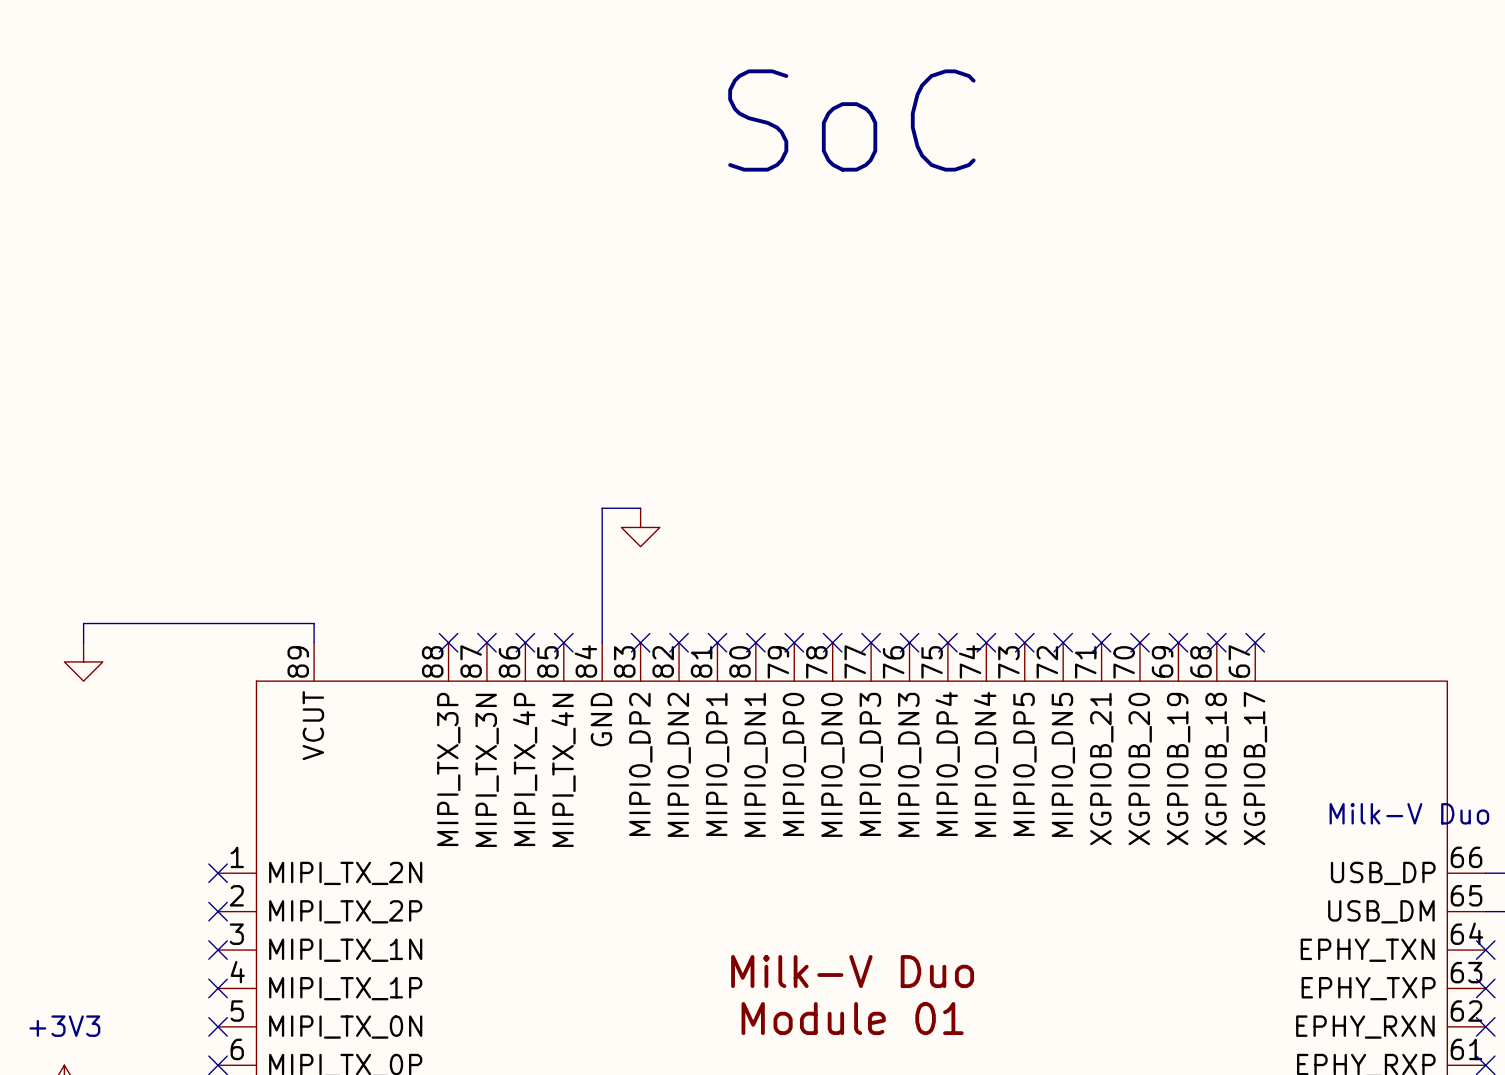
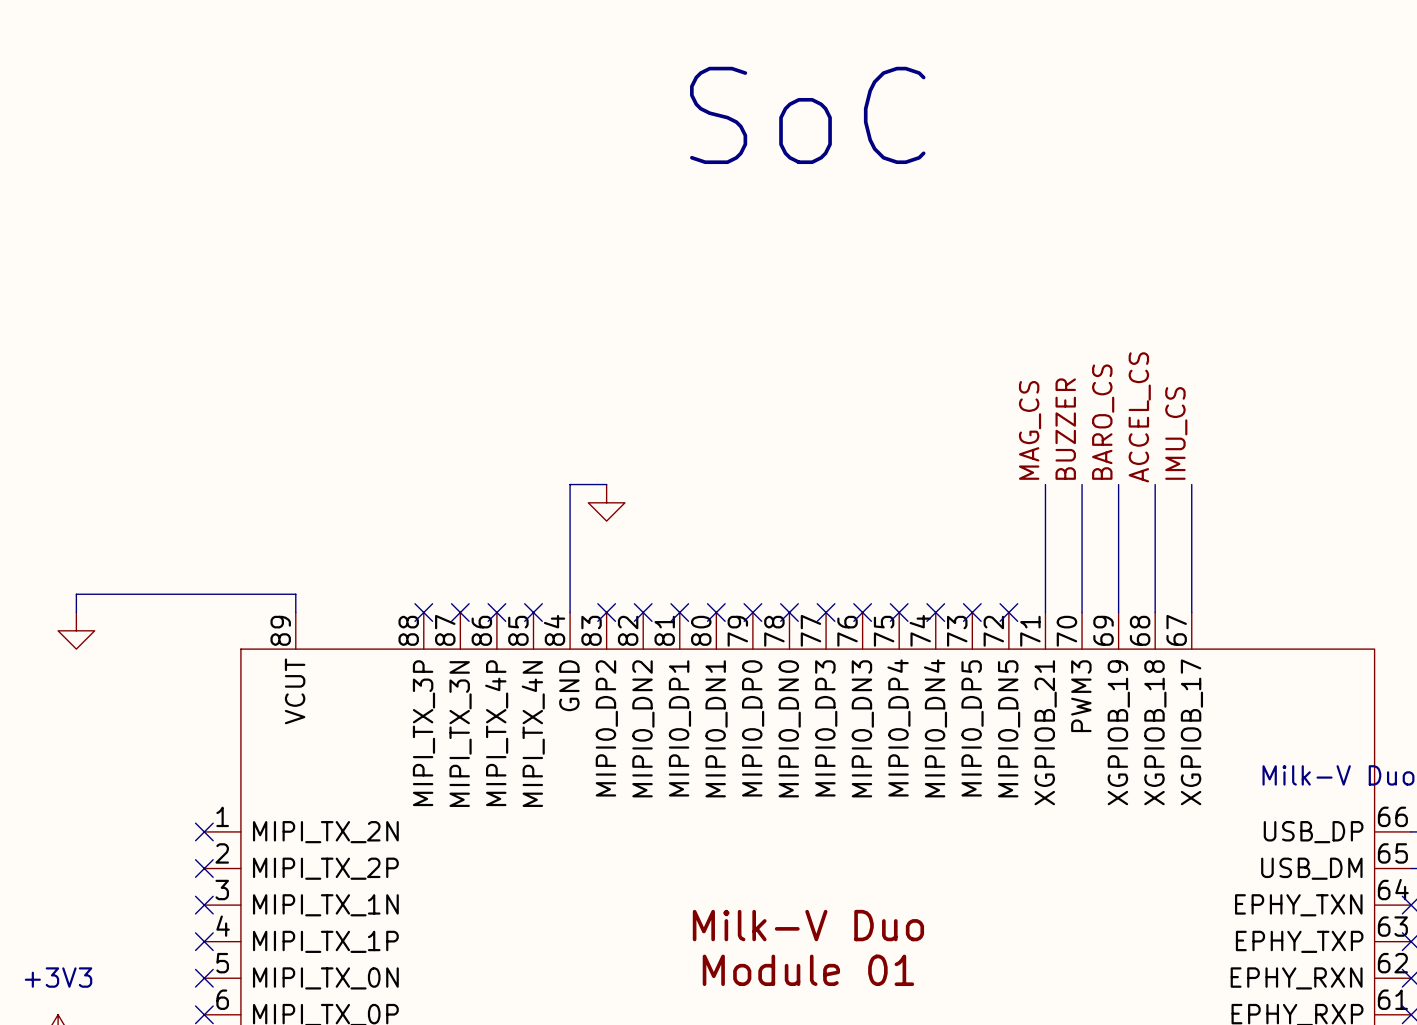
label: none -> ACCEL_CS (1139, 417)
label: none -> BARO_CS (1103, 422)
label: none -> BUZZER (1065, 429)
label: none -> MAG_CS (1030, 430)
label: none -> IMU_CS (1176, 433)
wire: none -> (1045, 484) (1045, 612)
wire: none -> (1082, 484) (1082, 612)
wire: none -> (1118, 484) (1118, 612)
wire: none -> (1155, 484) (1155, 612)
wire: none -> (1191, 484) (1191, 612)
no-connect mark: (1101, 642) -> none
no-connect mark: (1140, 642) -> none
no-connect mark: (1178, 642) -> none
no-connect mark: (1216, 642) -> none
no-connect mark: (1255, 642) -> none
part pin name: XGPIOB_20 (1140, 768) -> PWM3 (1081, 696)

